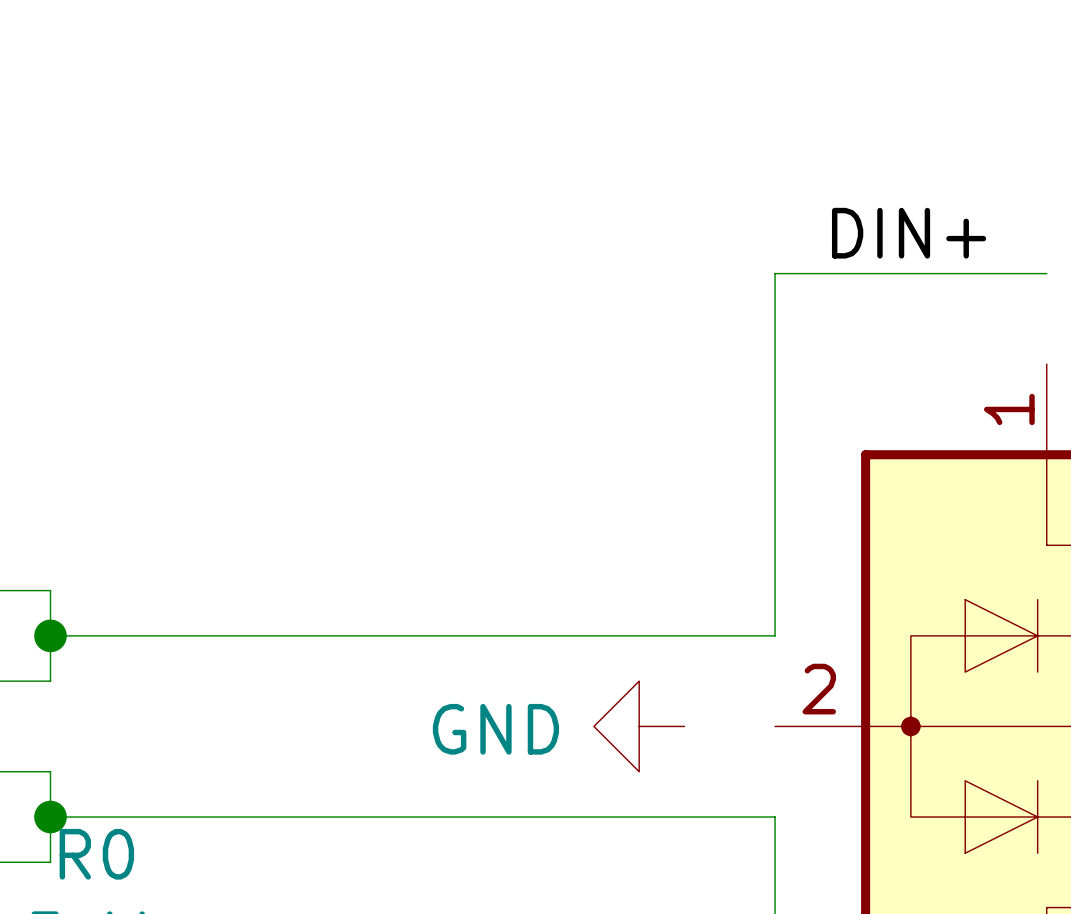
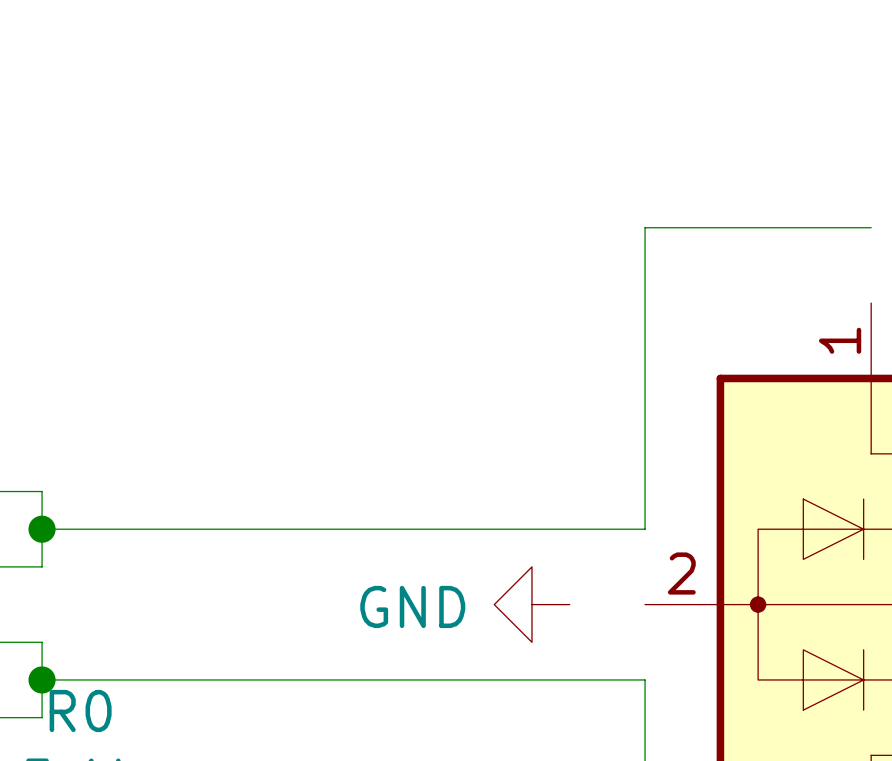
label: DIN+ (909, 233) -> none

